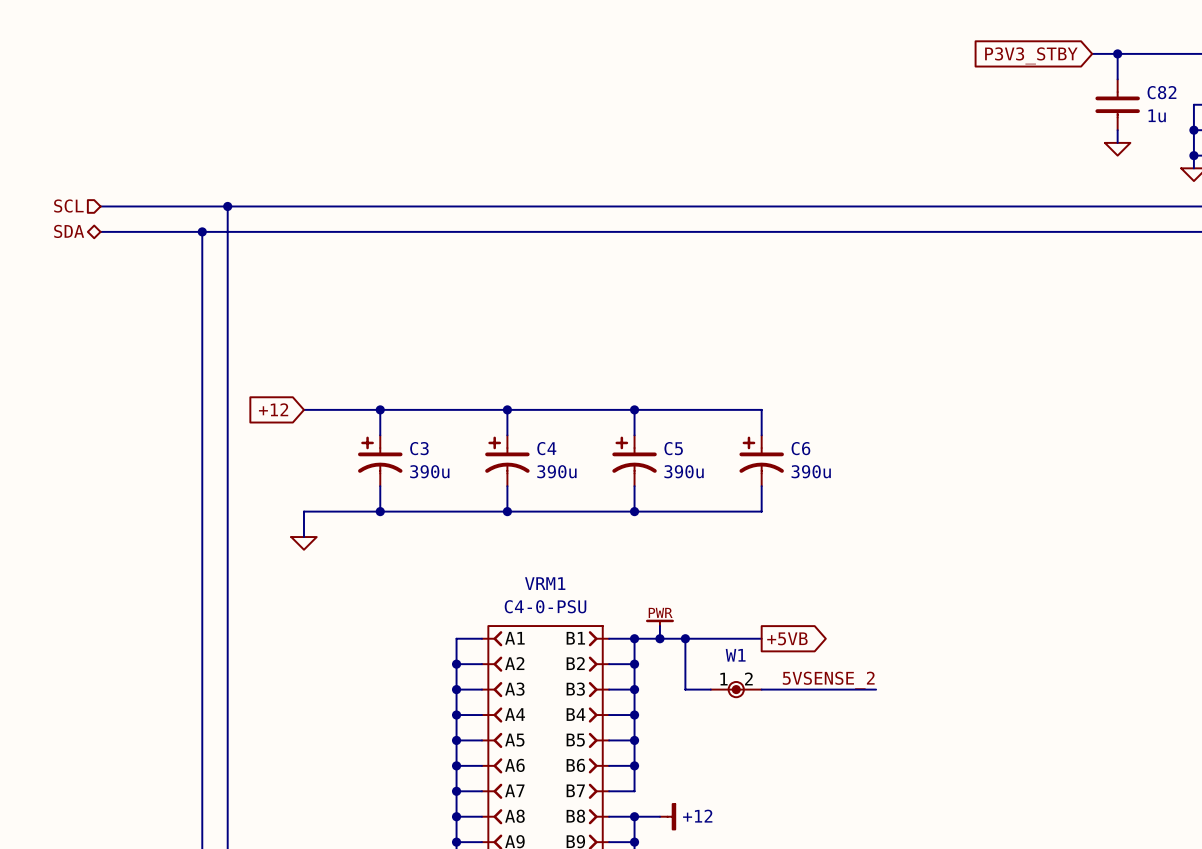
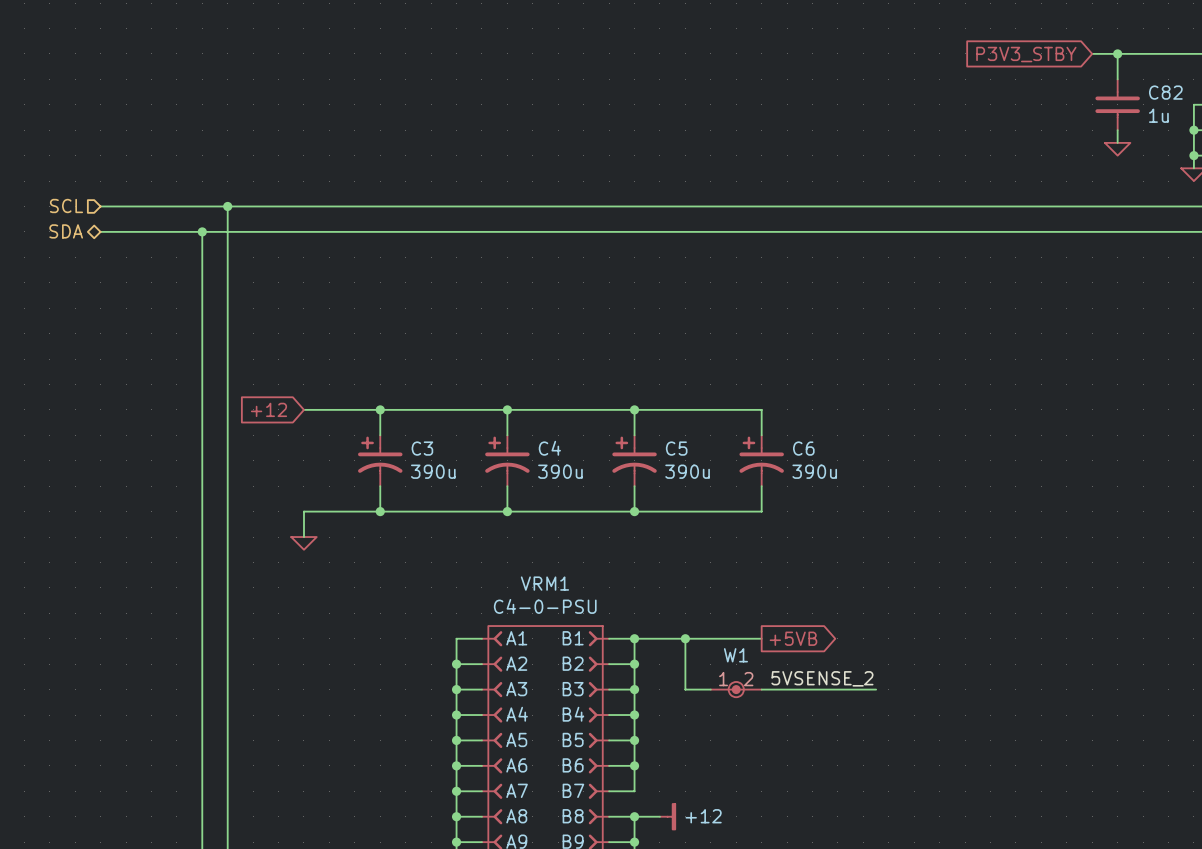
power symbol: (659, 622) -> none
wire: (659, 626) (659, 638) -> none
junction: (659, 638) -> none

